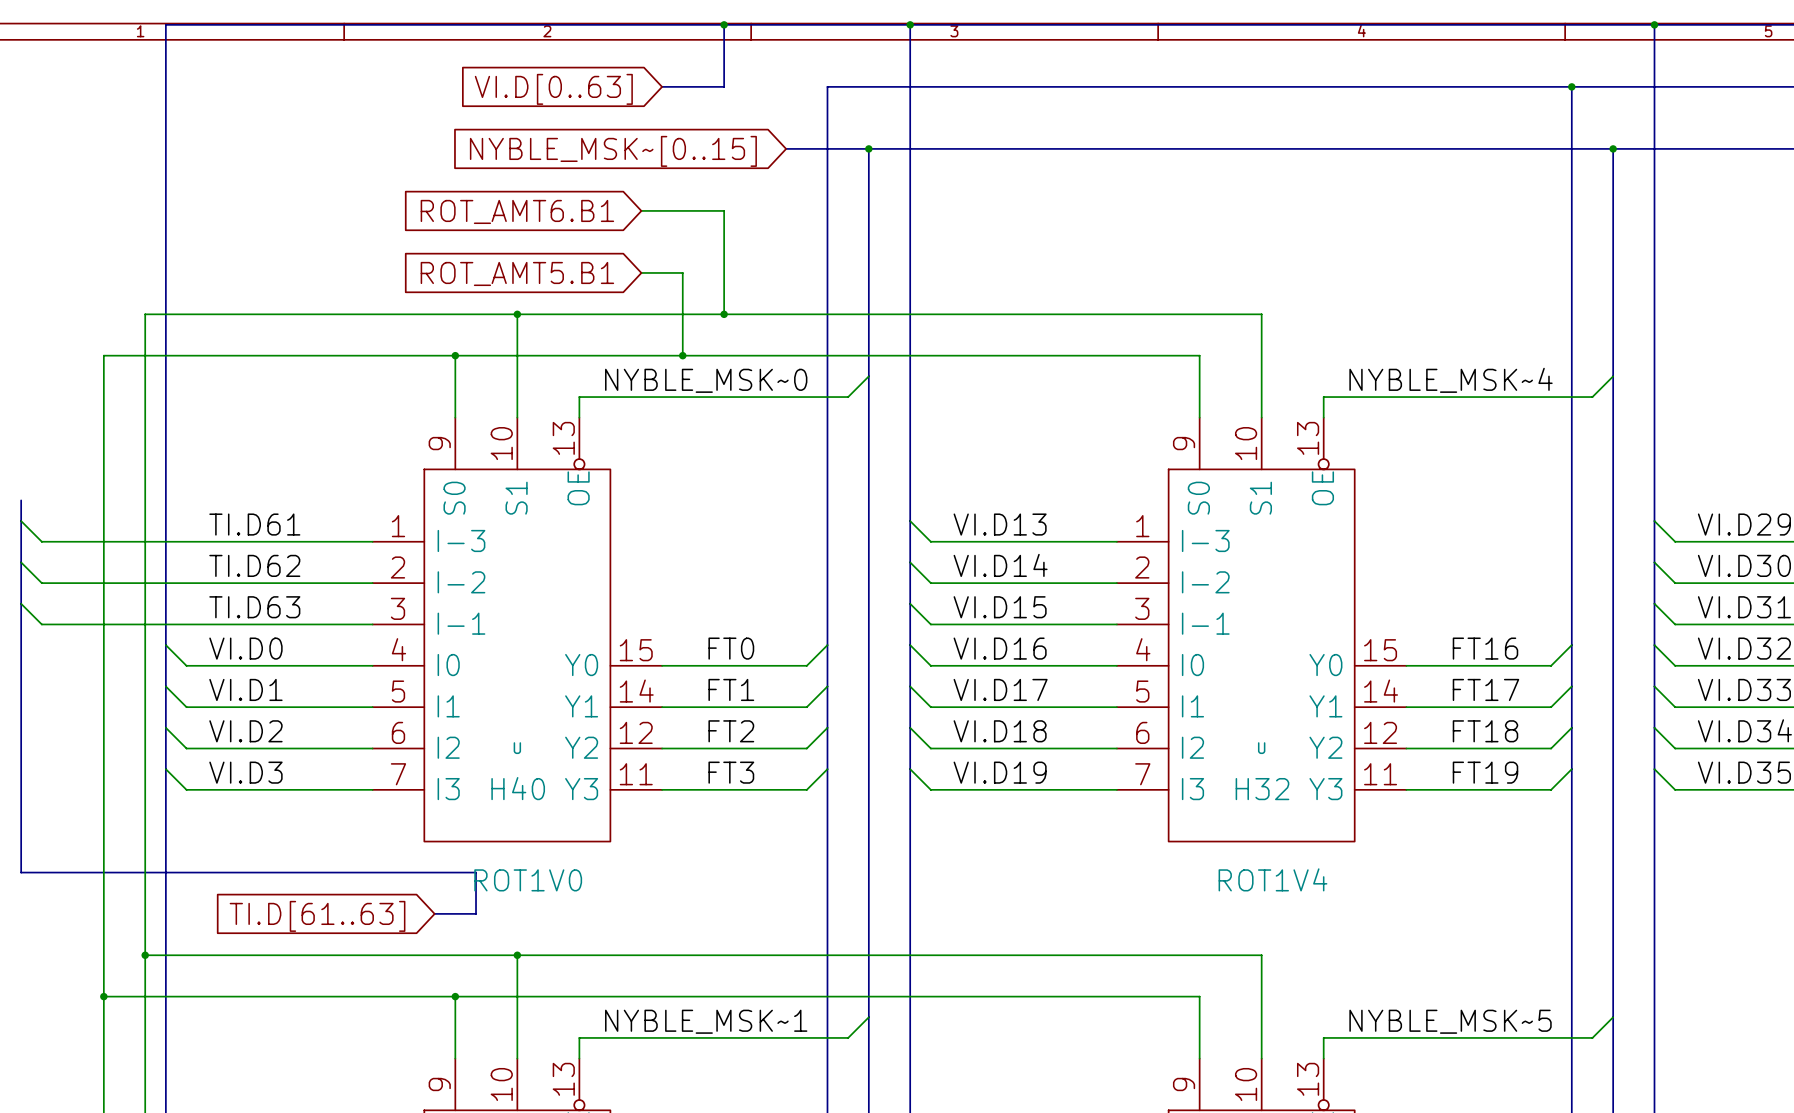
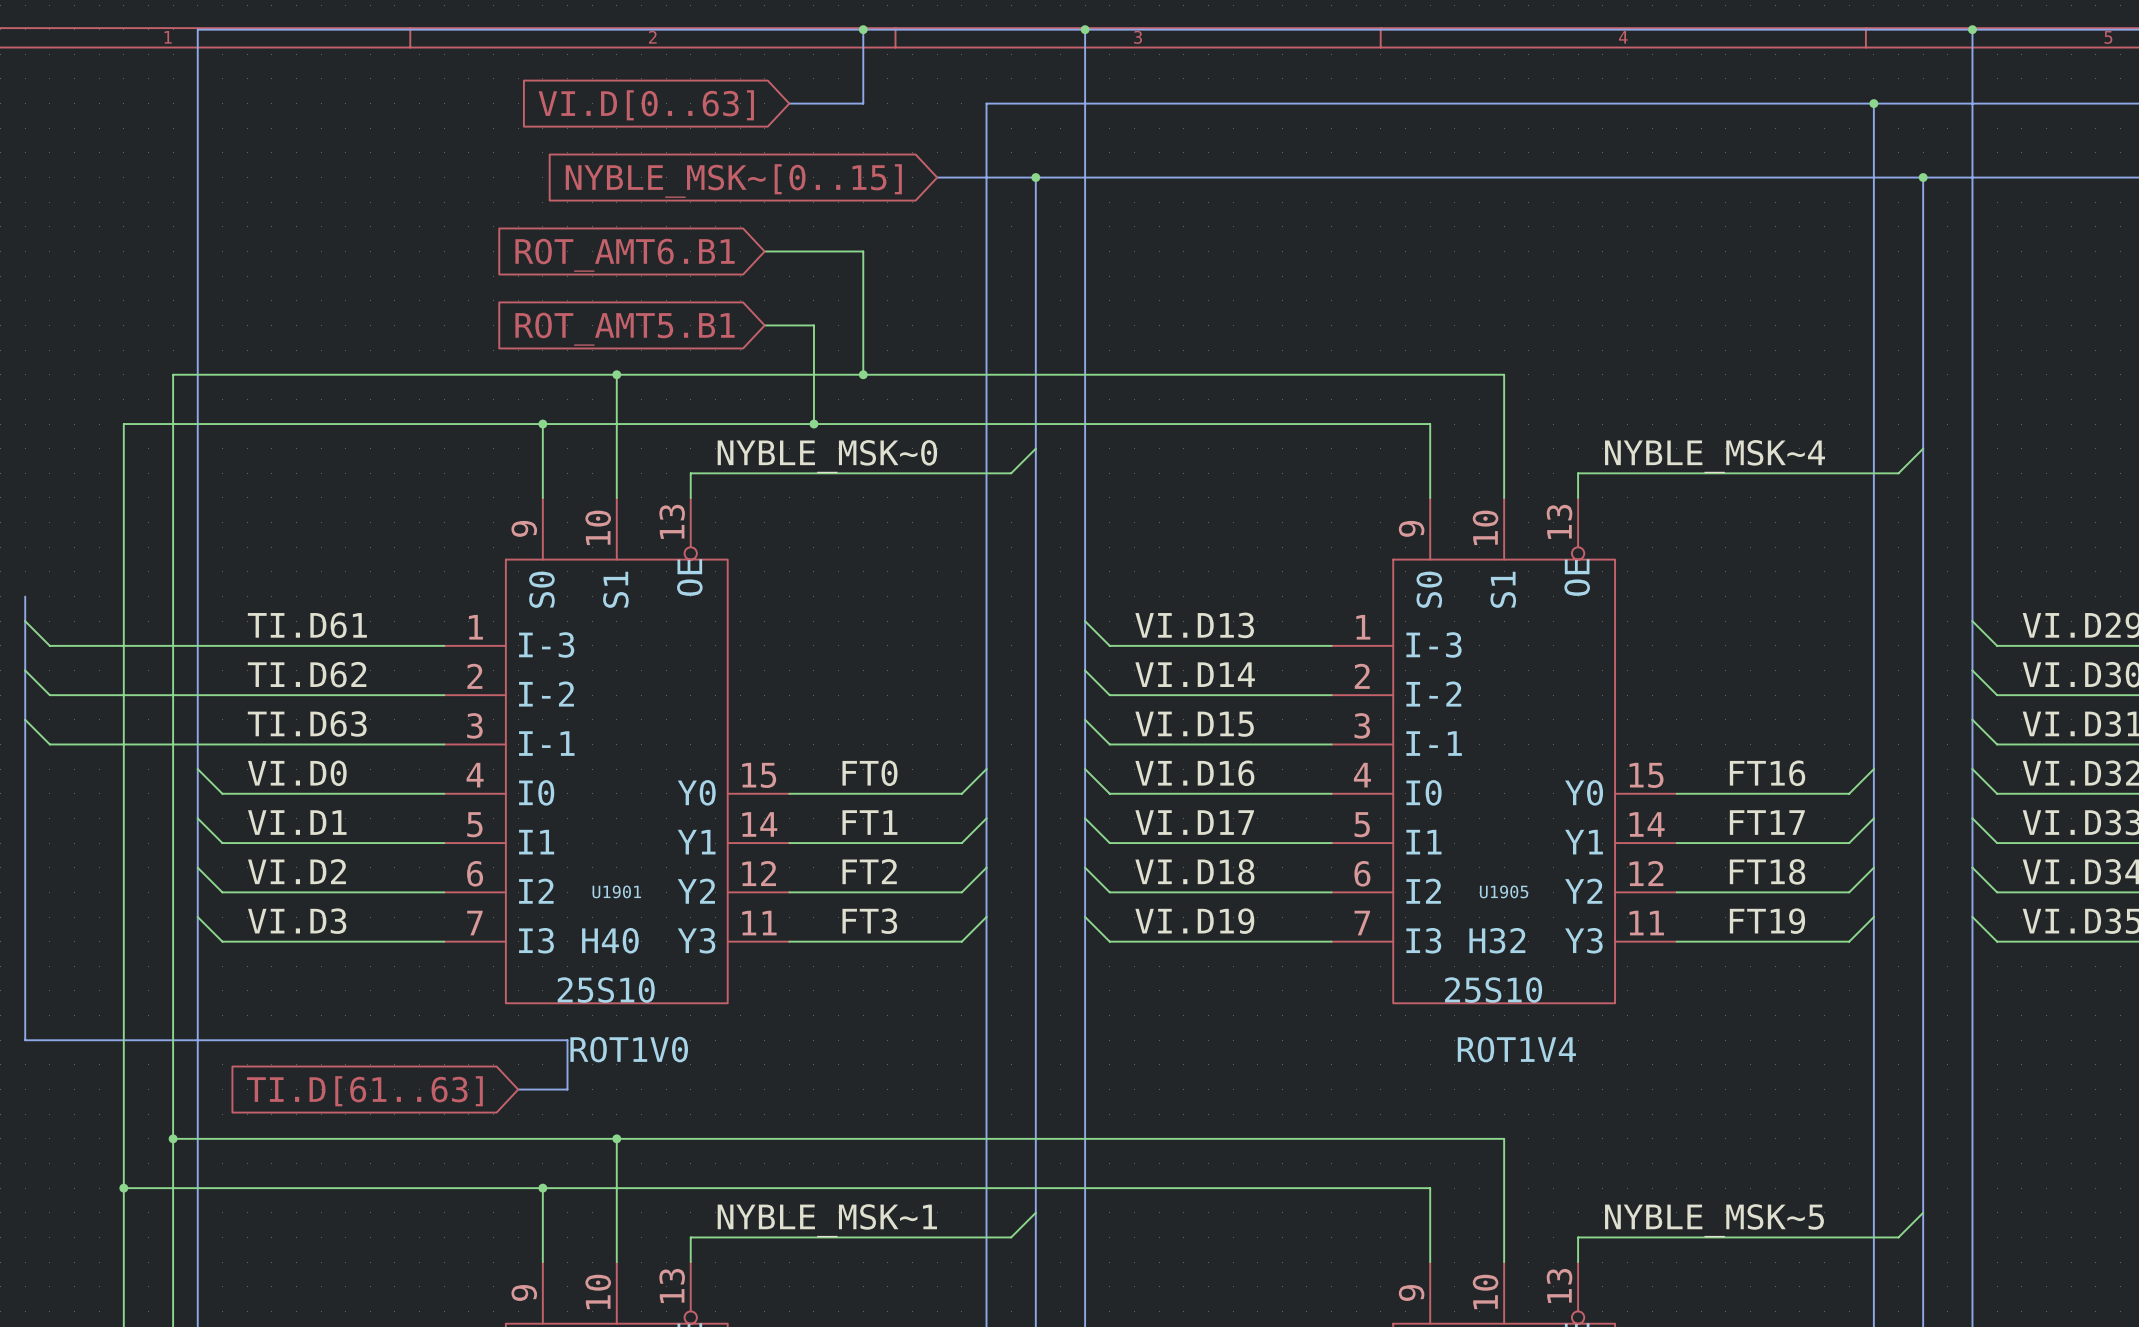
U name: U (517, 748) -> U1901 (616, 891)
U name: U (1261, 748) -> U1905 (1504, 891)
U value: none -> 25S10 (606, 990)
U value: none -> 25S10 (1493, 990)

